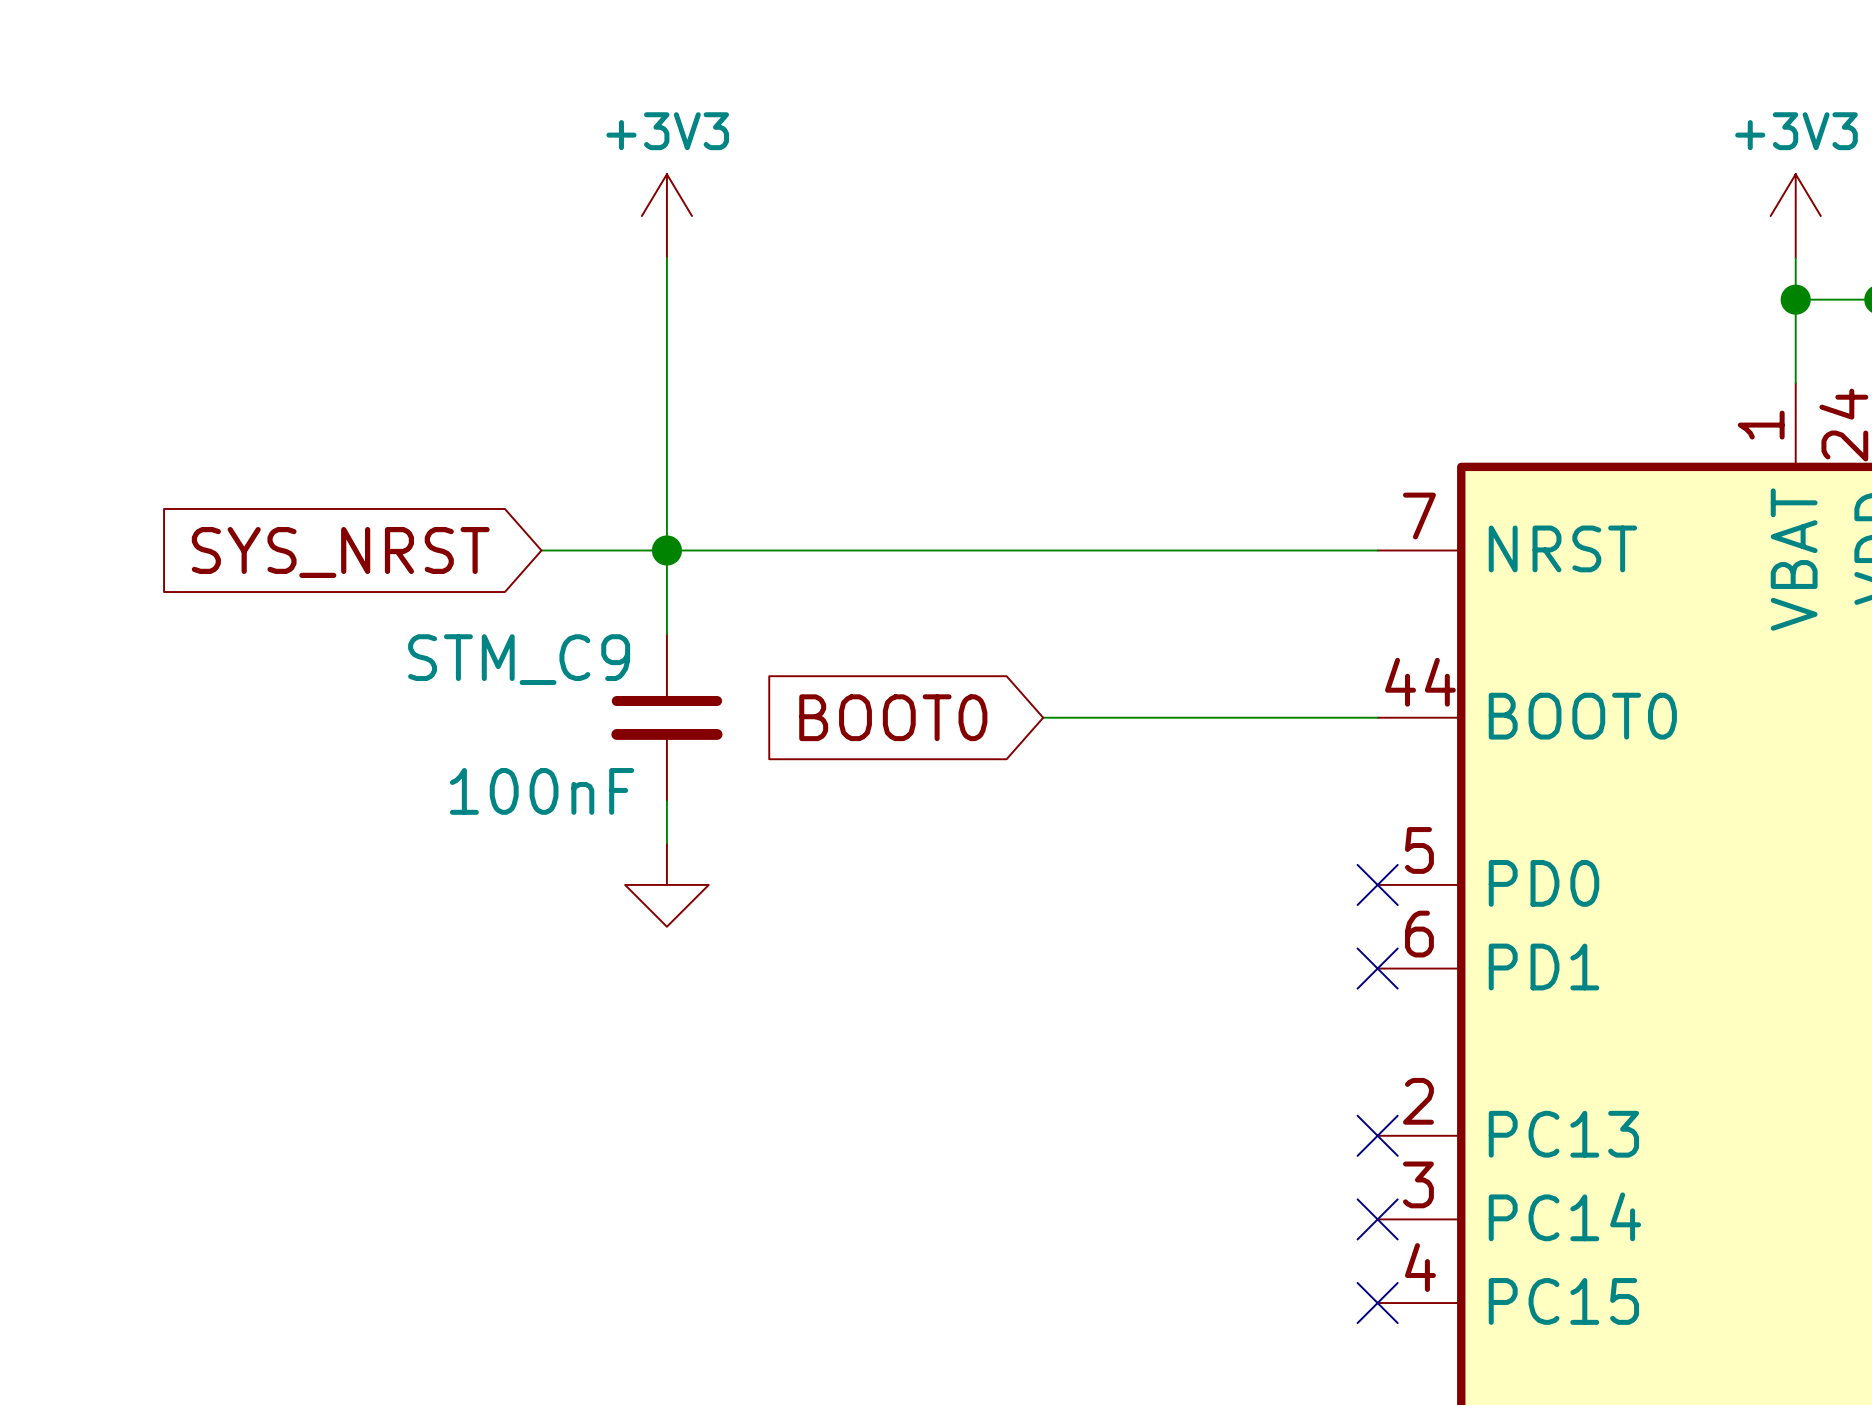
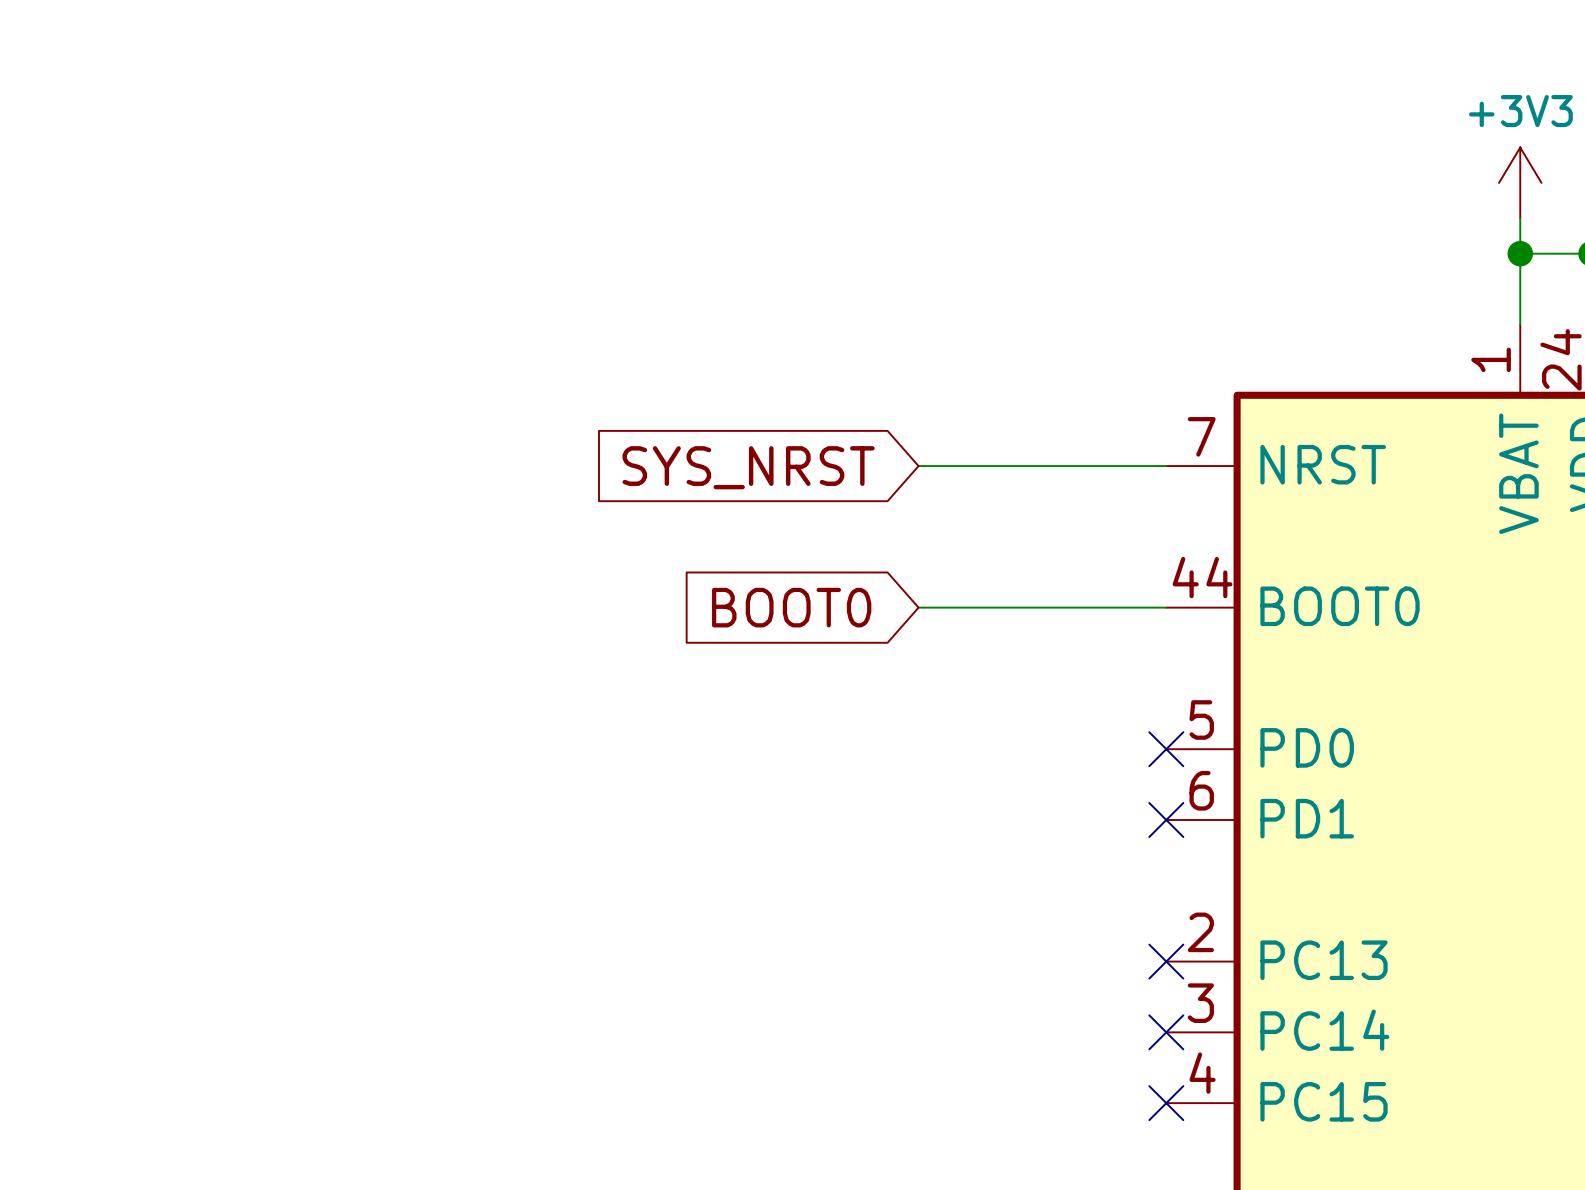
power symbol: +3V3 (666, 216) -> none
wire: (666, 257) (666, 634) -> none
wire: (541, 550) (1085, 550) -> none
junction: (666, 550) -> none
global label position: SYS_NRST (340, 552) -> SYS_NRST (748, 467)
STM_C9: 100nF (666, 717) -> none
global label position: BOOT0 (893, 717) -> BOOT0 (791, 607)
wire: (1043, 717) (1085, 717) -> none
wire: (666, 801) (666, 843) -> none
power symbol: (666, 884) -> none

